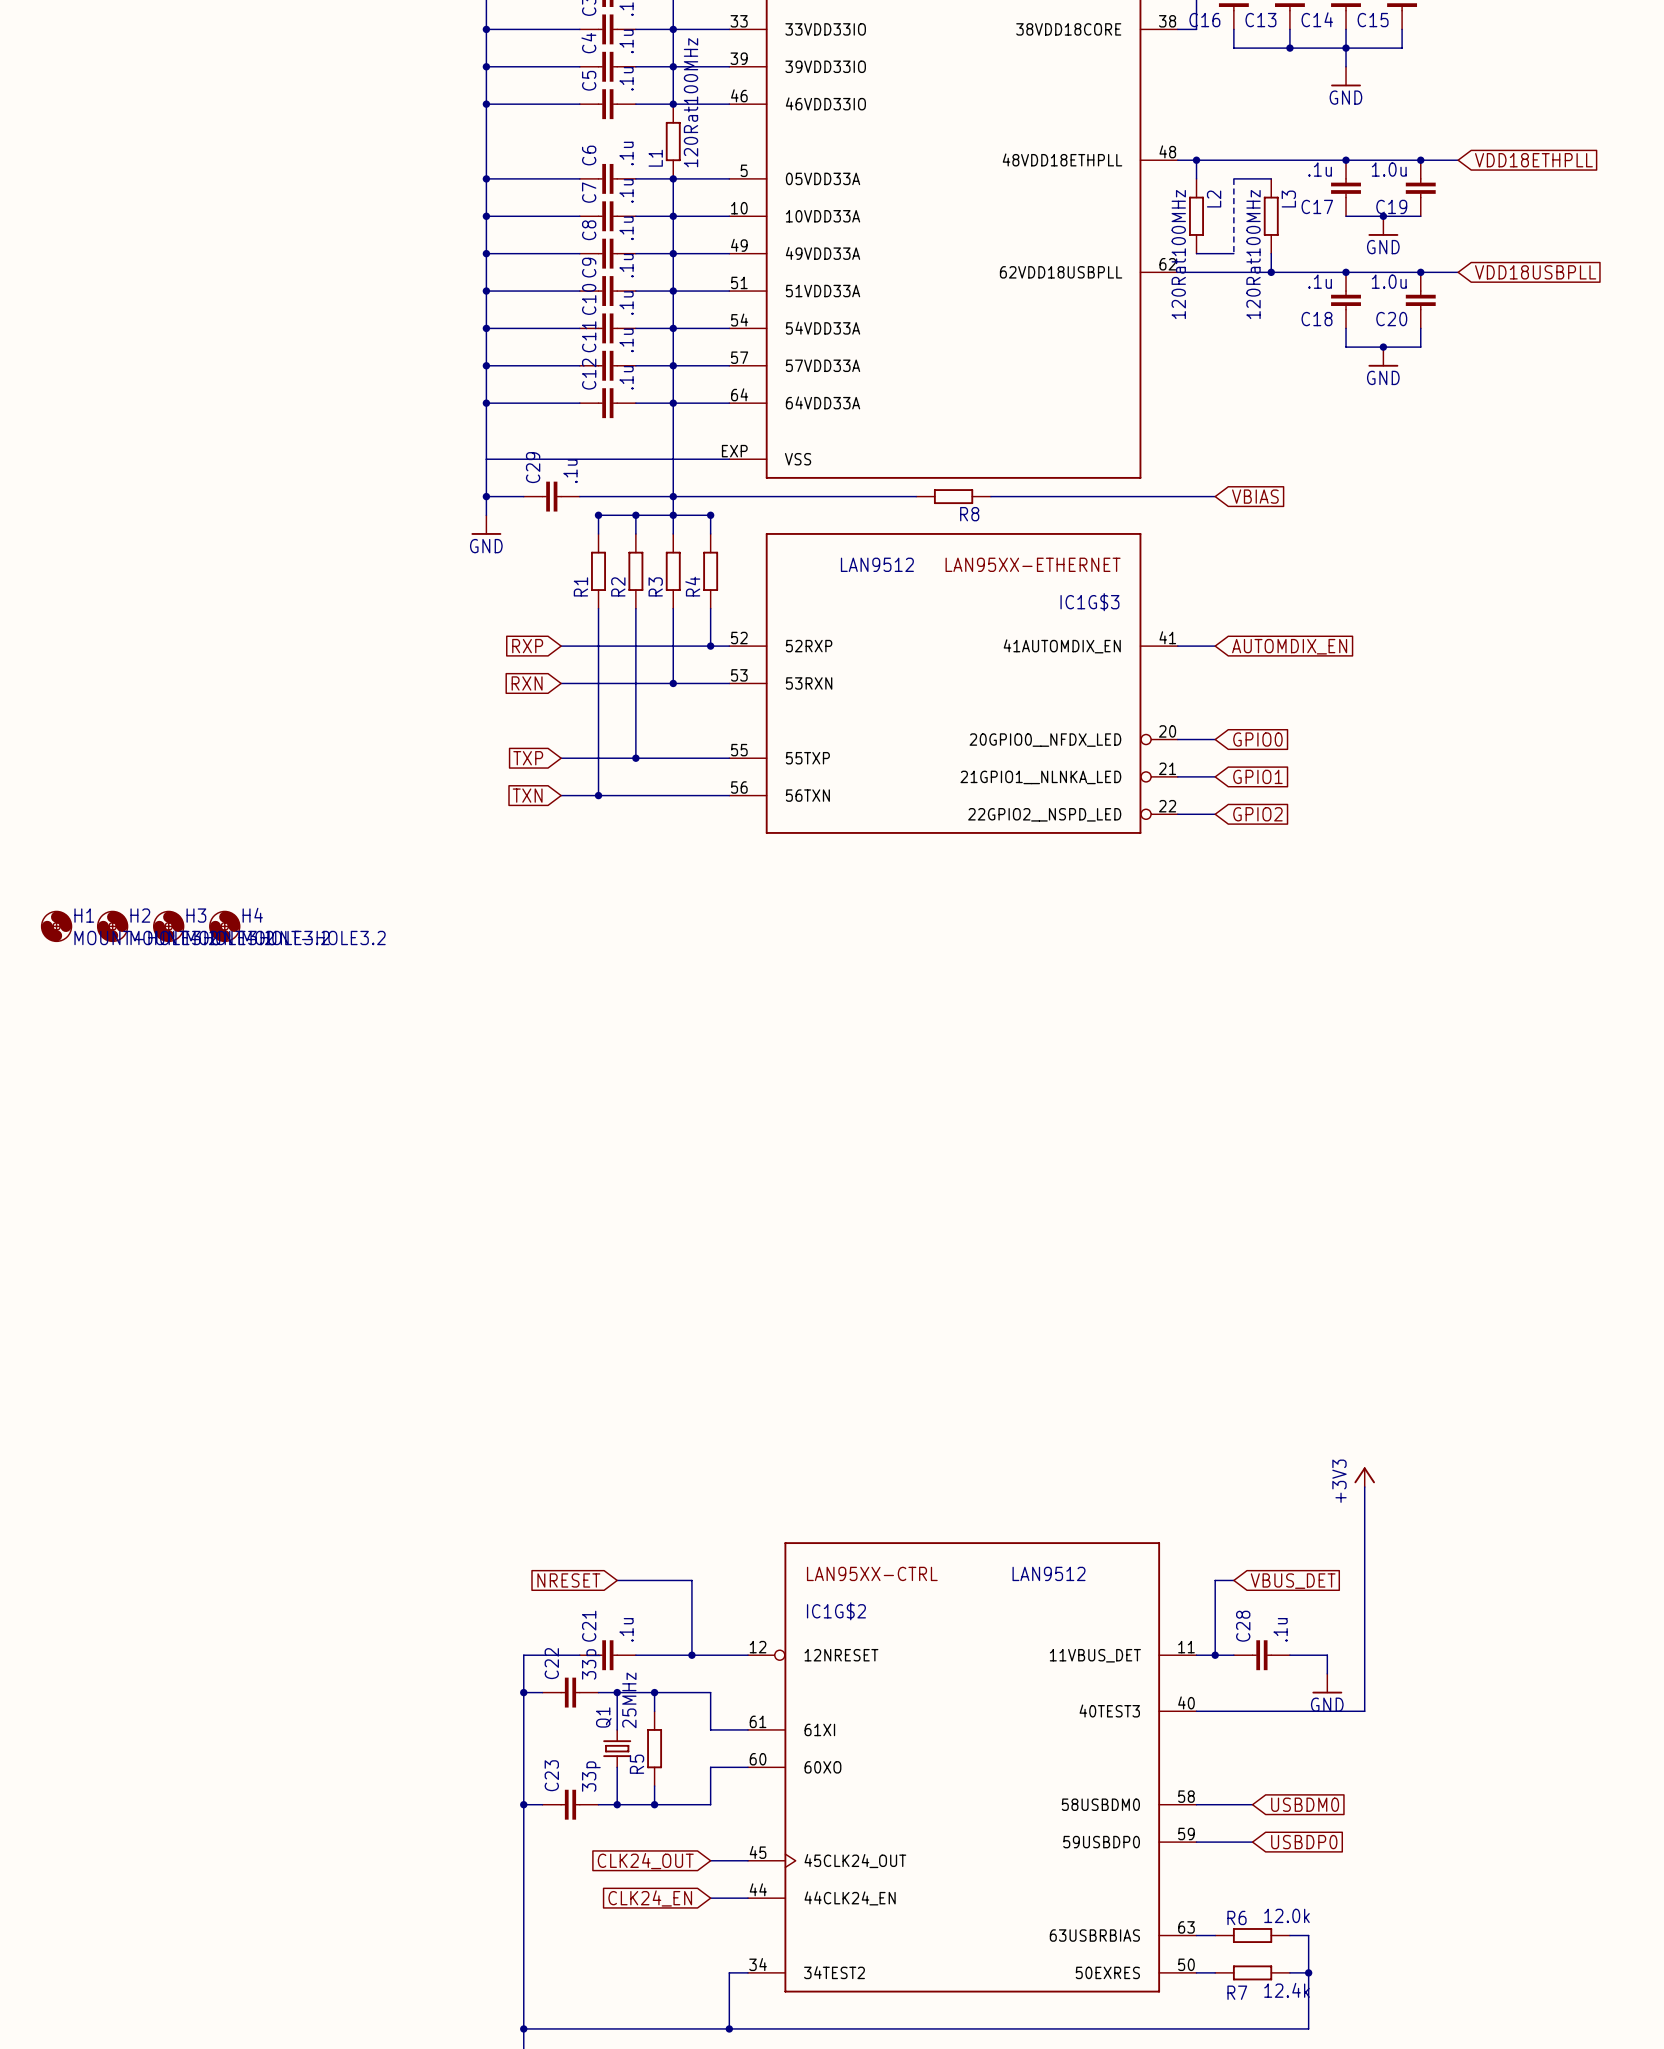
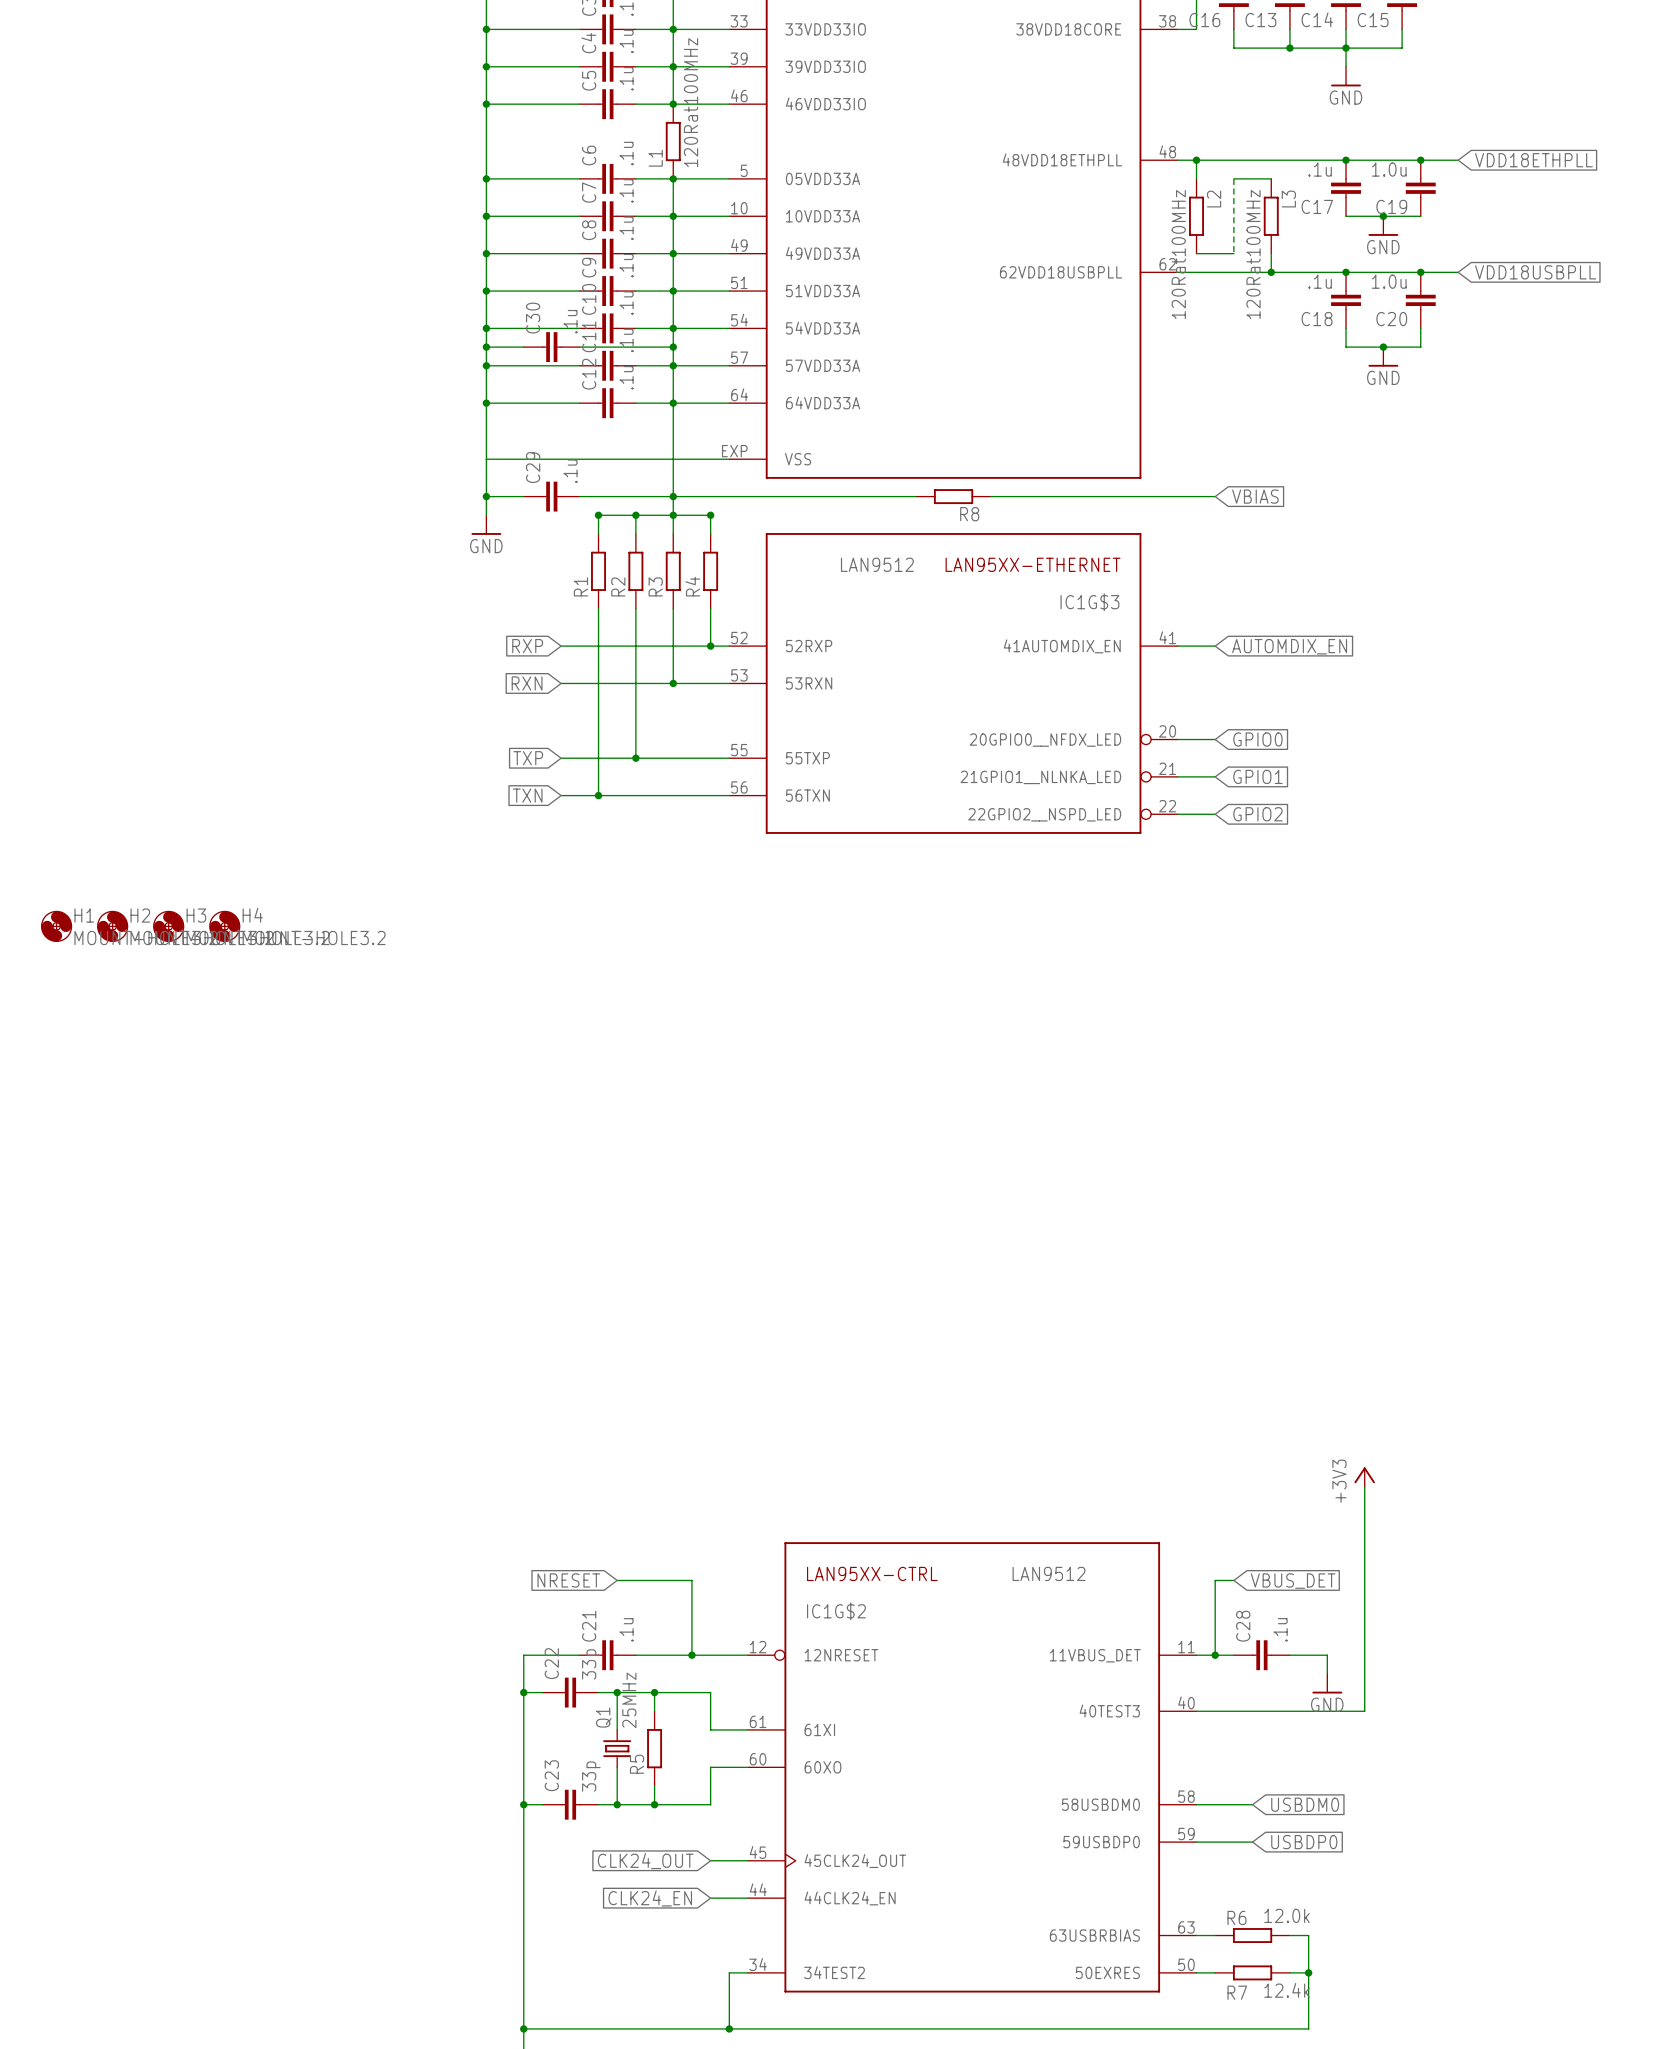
wire: none -> (486, 347) (523, 347)
junction: none -> (486, 347)
C30: none -> .1u (551, 347)
wire: none -> (579, 347) (673, 347)
junction: none -> (673, 347)

